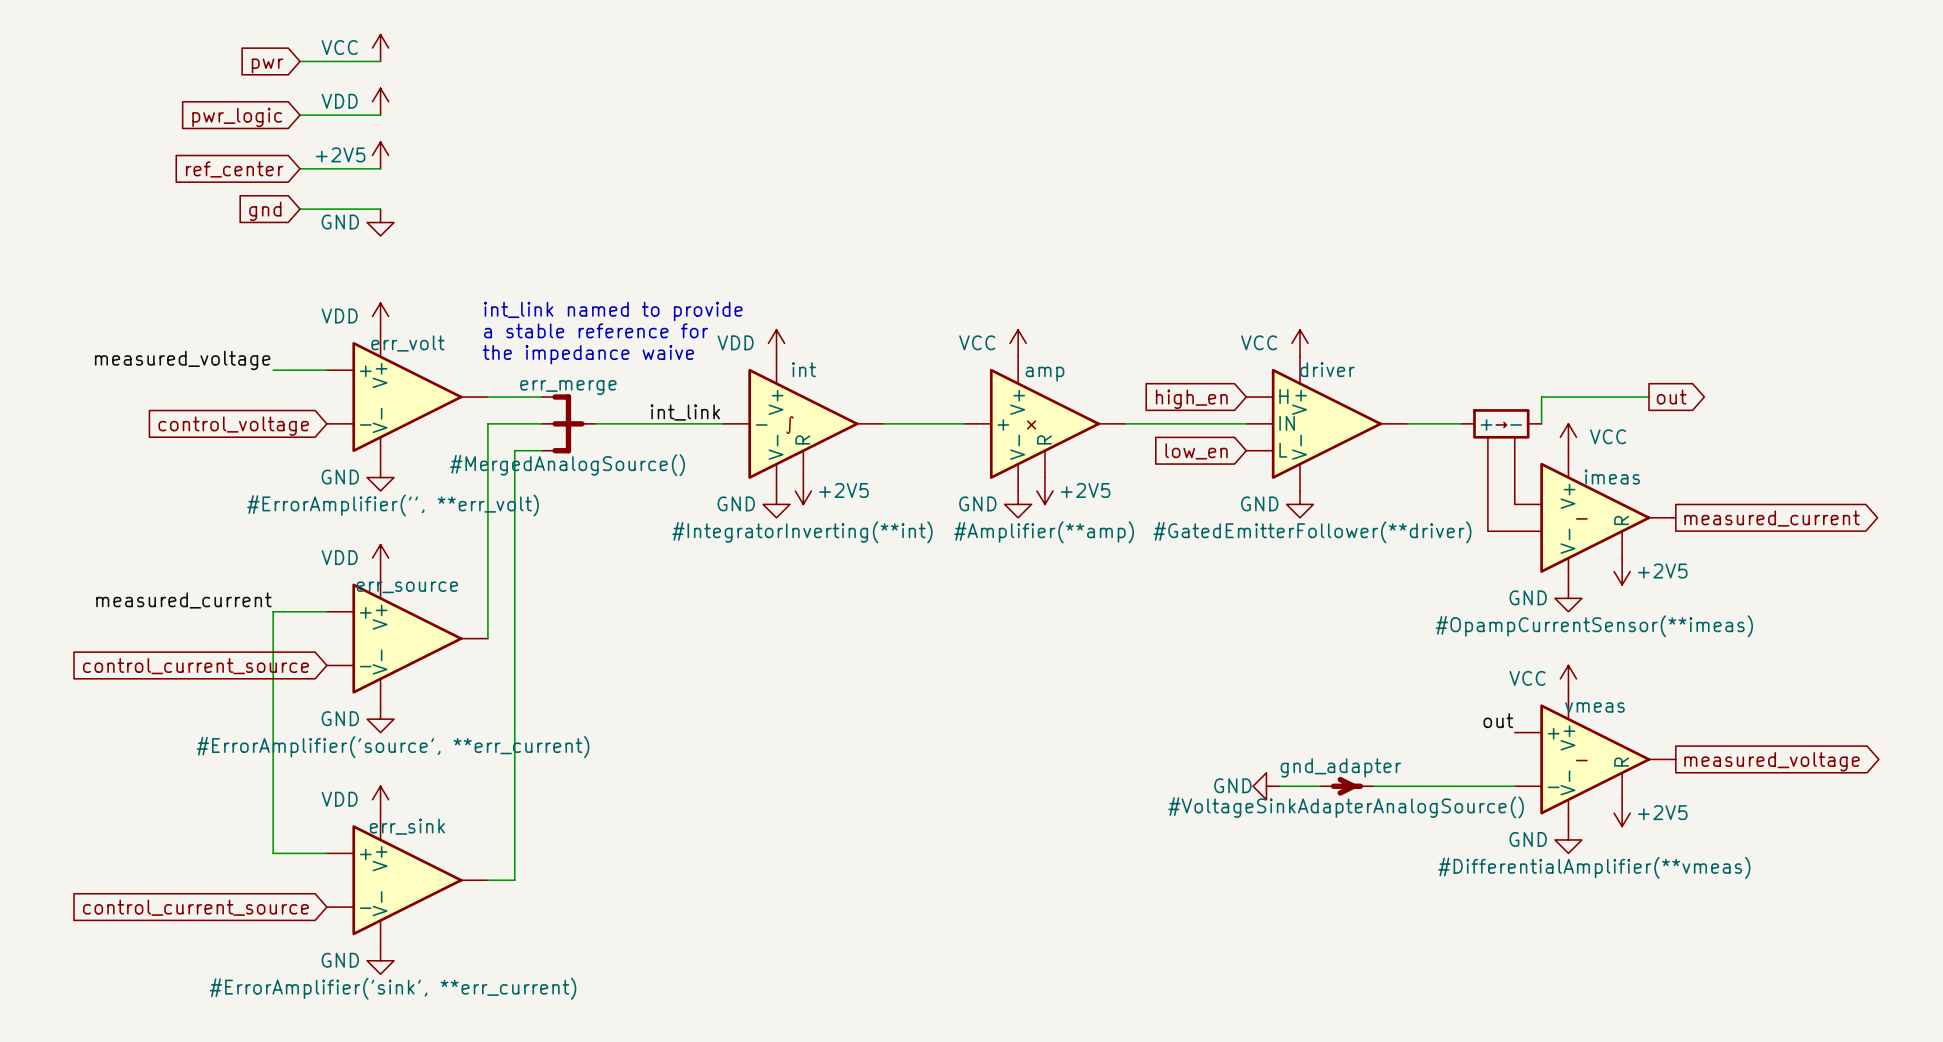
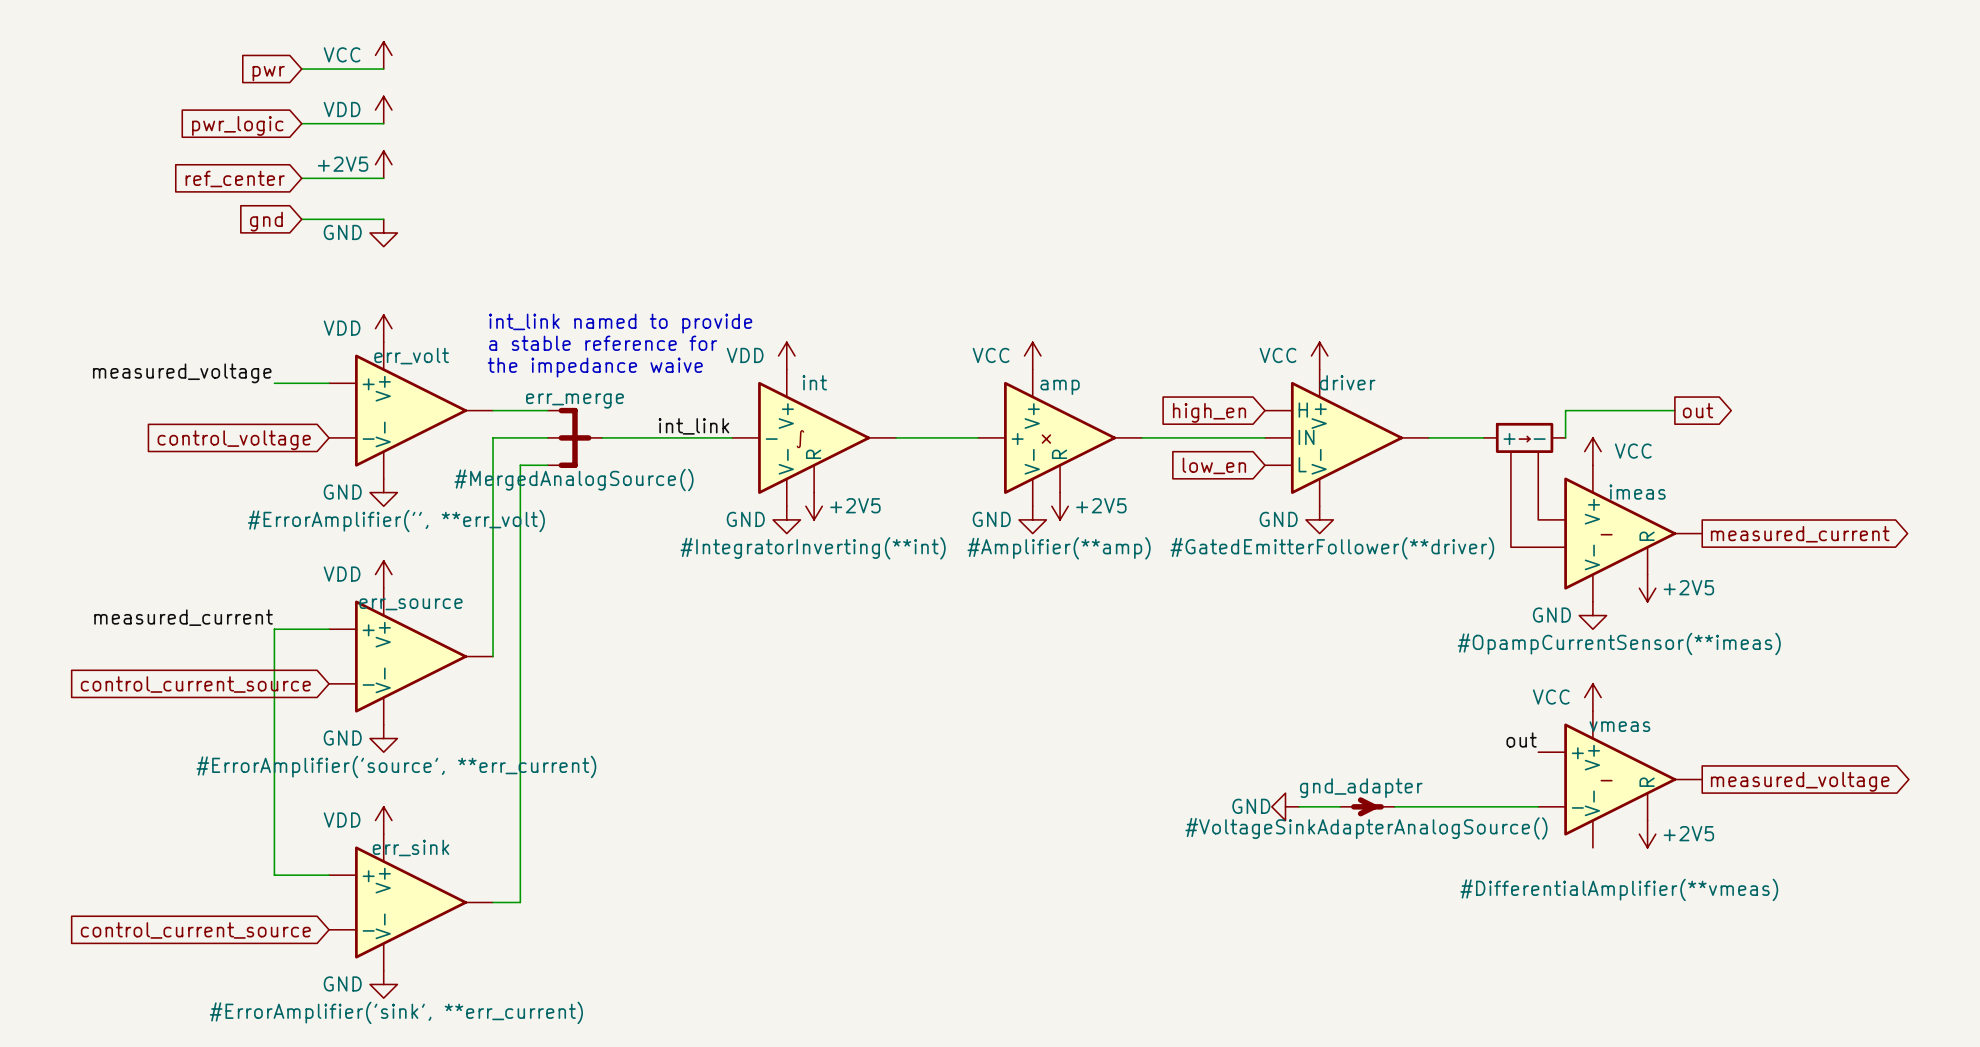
power symbol: GND (1568, 839) -> none

